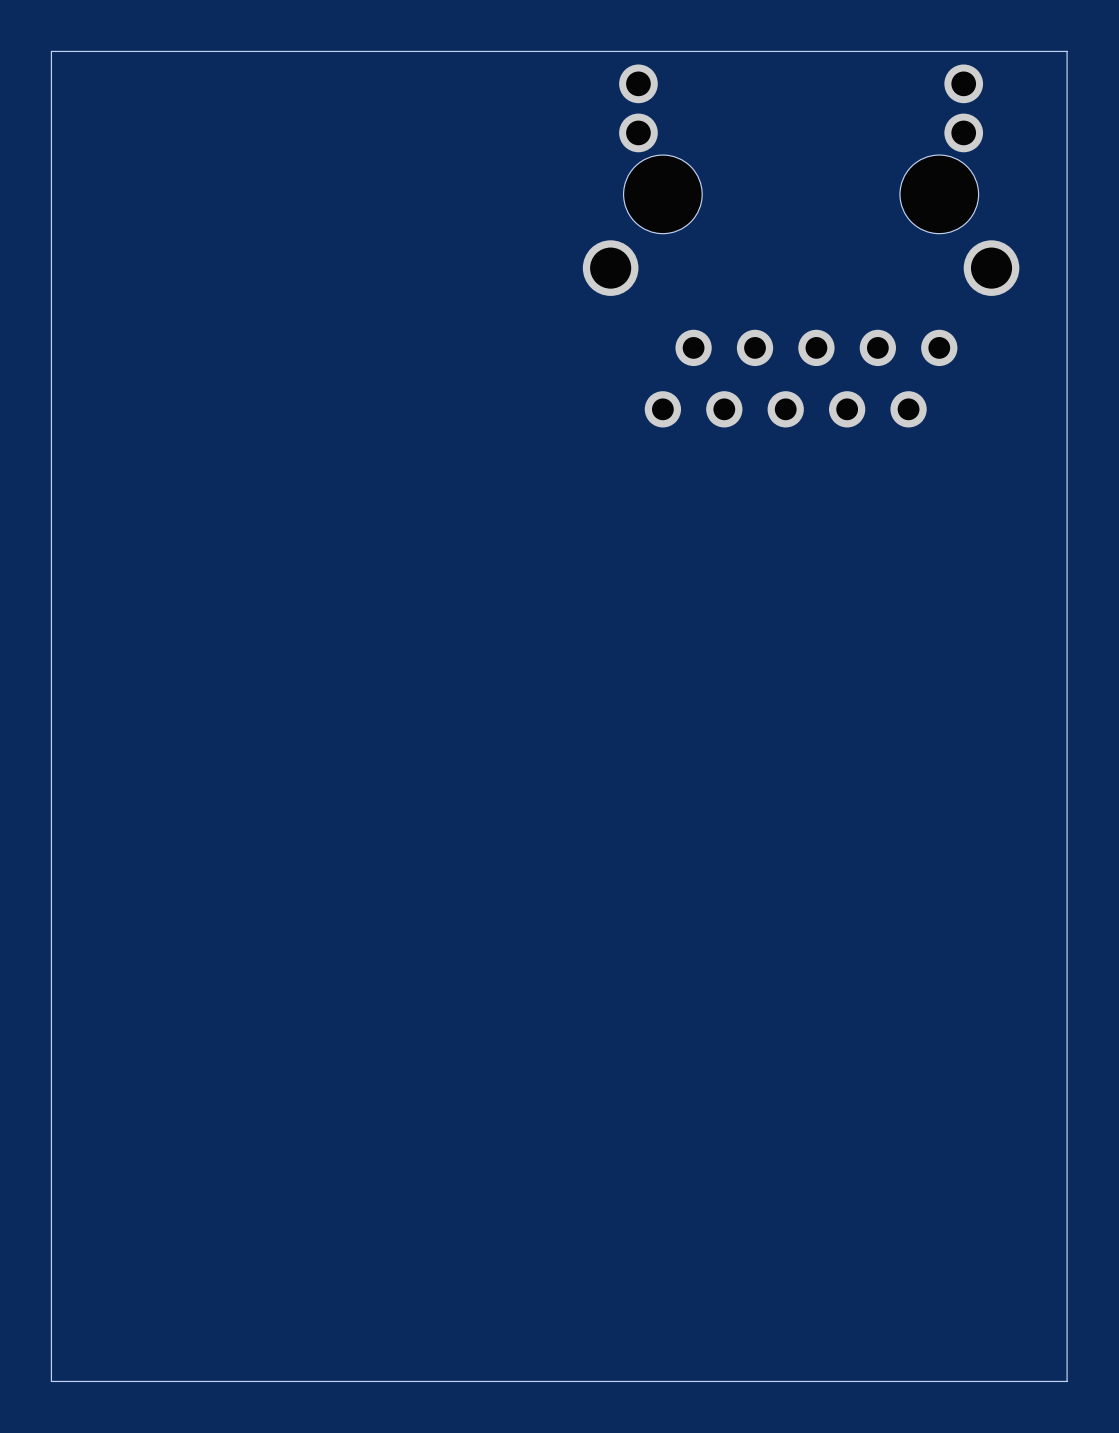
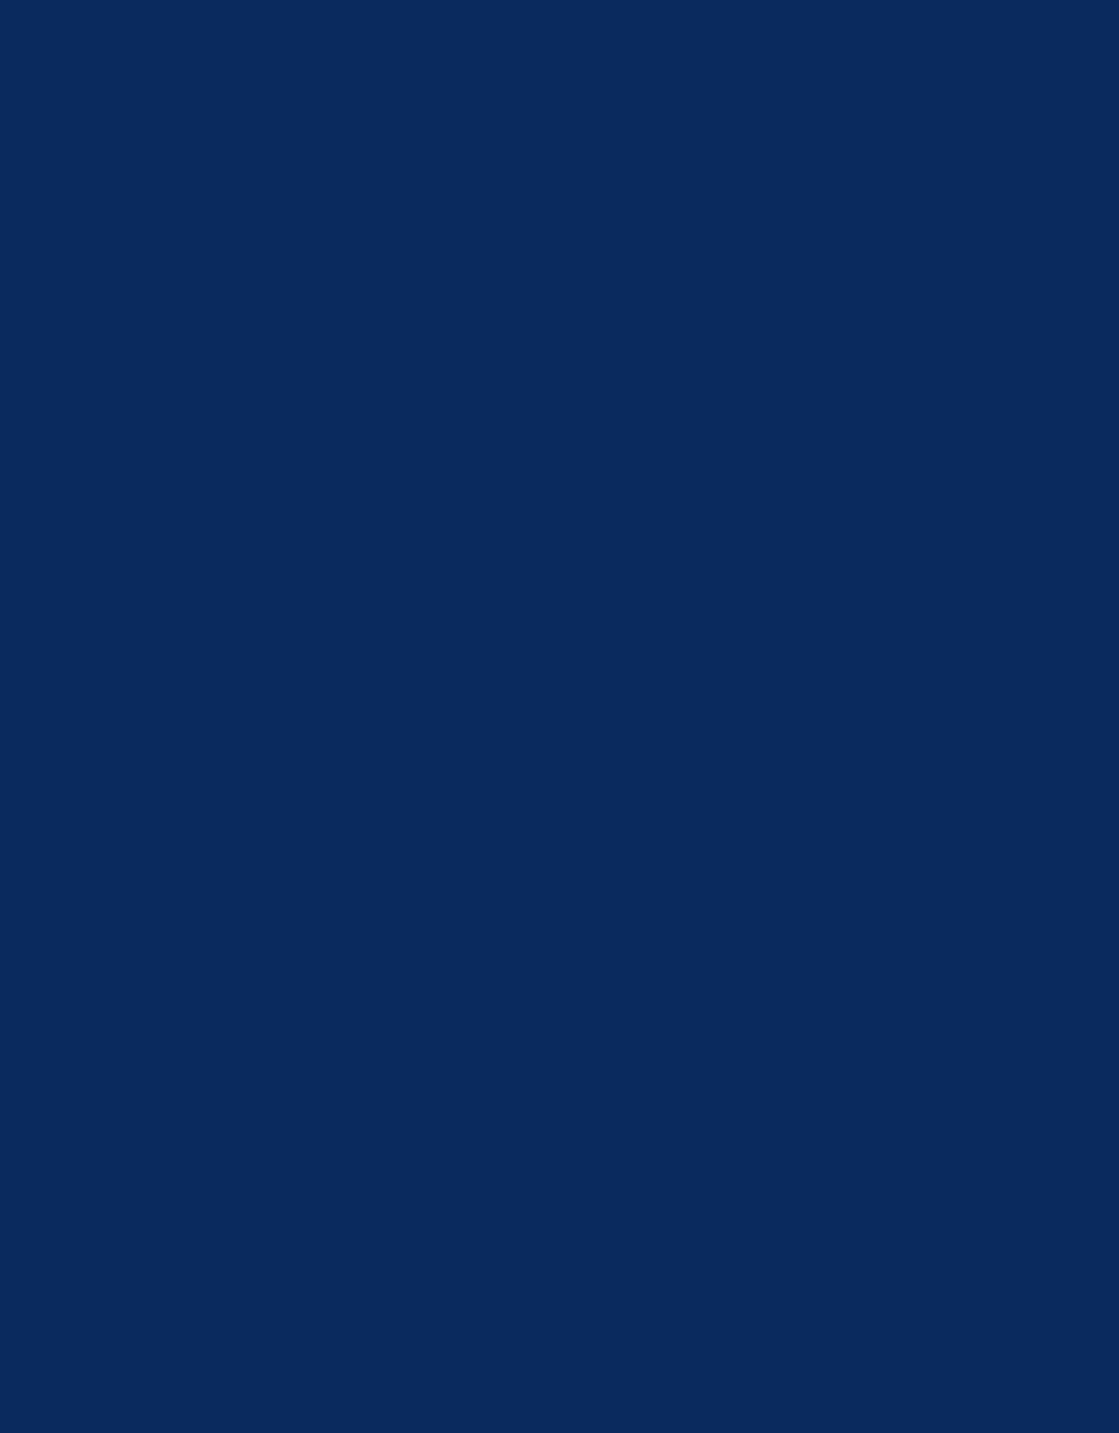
board edge: (1067, 51) (51, 51) (51, 1381) (1067, 1381) (1067, 51) -> none
part: (801, 245) -> none

